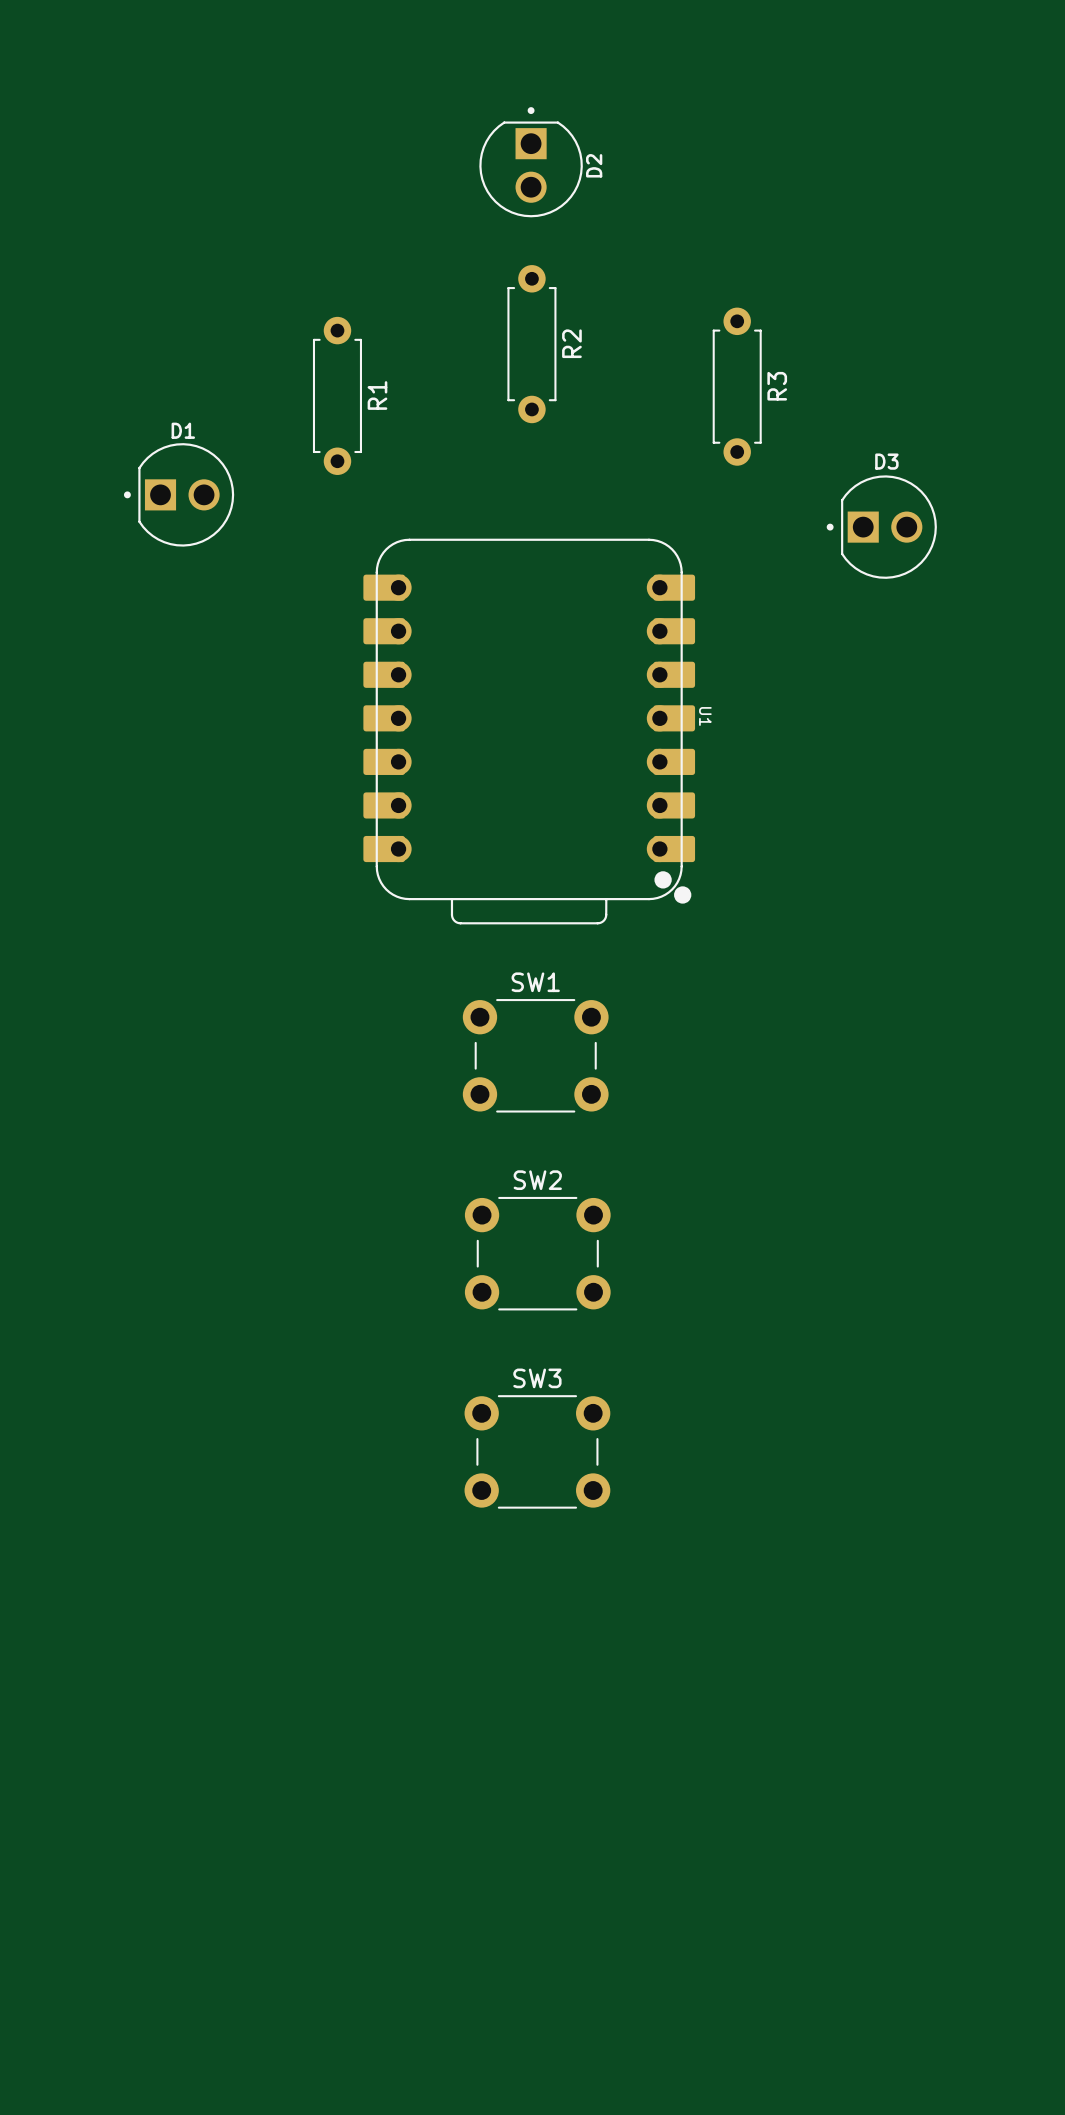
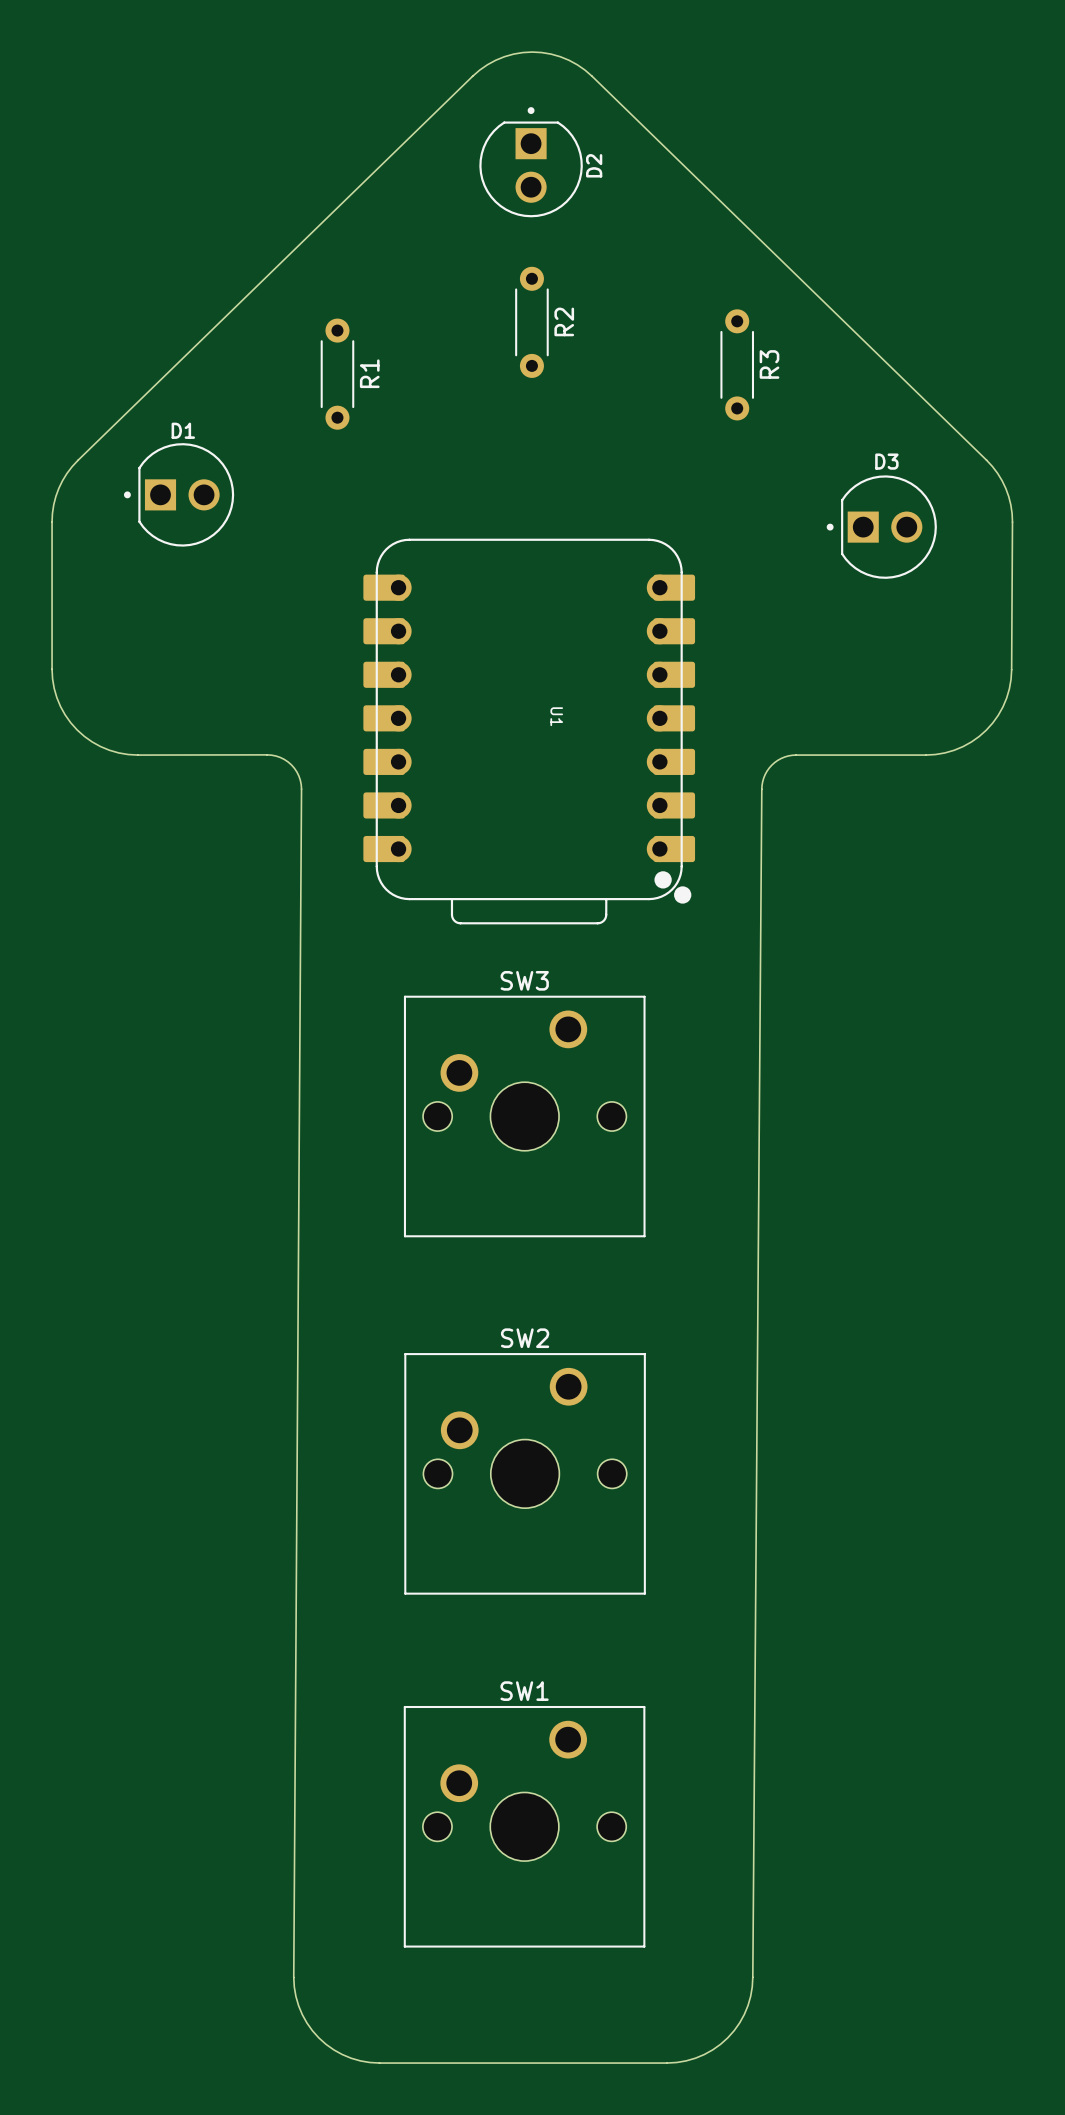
board edge: none -> (472, 76) (77, 460) (66, 473) (58, 488) (52, 513) (52, 678) (60, 706) (70, 722) (84, 736) (100, 746) (118, 752) (137, 755) (271, 755) (284, 759) (291, 764) (296, 771) (301, 784) (293, 1977) (295, 1996) (302, 2014) (312, 2030) (326, 2044) (342, 2054) (369, 2062) (676, 2062) (704, 2054) (727, 2037) (744, 2014) (752, 1986) (762, 781) (771, 765) (788, 755) (935, 754) (962, 746) (986, 730) (1003, 706) (1011, 679) (1012, 513) (1005, 488) (997, 473) (986, 460) (585, 70) (560, 56) (541, 52) (522, 52) (495, 60) (472, 76)
R2 footprint: [507, 265, 557, 424] -> [515, 266, 549, 378]
R3 footprint: [712, 307, 762, 466] -> [720, 309, 755, 421]
R1 footprint: [312, 316, 362, 475] -> [320, 318, 355, 430]
U1 name position: U1 (705, 716) -> U1 (556, 716)
SW1 name position: SW1 (535, 982) -> SW1 (524, 1691)
SW1 footprint: [462, 999, 609, 1113] -> [403, 1705, 646, 1948]
SW2 name position: SW2 (537, 1180) -> SW2 (525, 1338)
SW2 footprint: [464, 1196, 611, 1311] -> [404, 1353, 646, 1595]
SW3 name position: SW3 (537, 1378) -> SW3 (524, 980)
SW3 footprint: [464, 1395, 611, 1509] -> [403, 995, 646, 1238]

